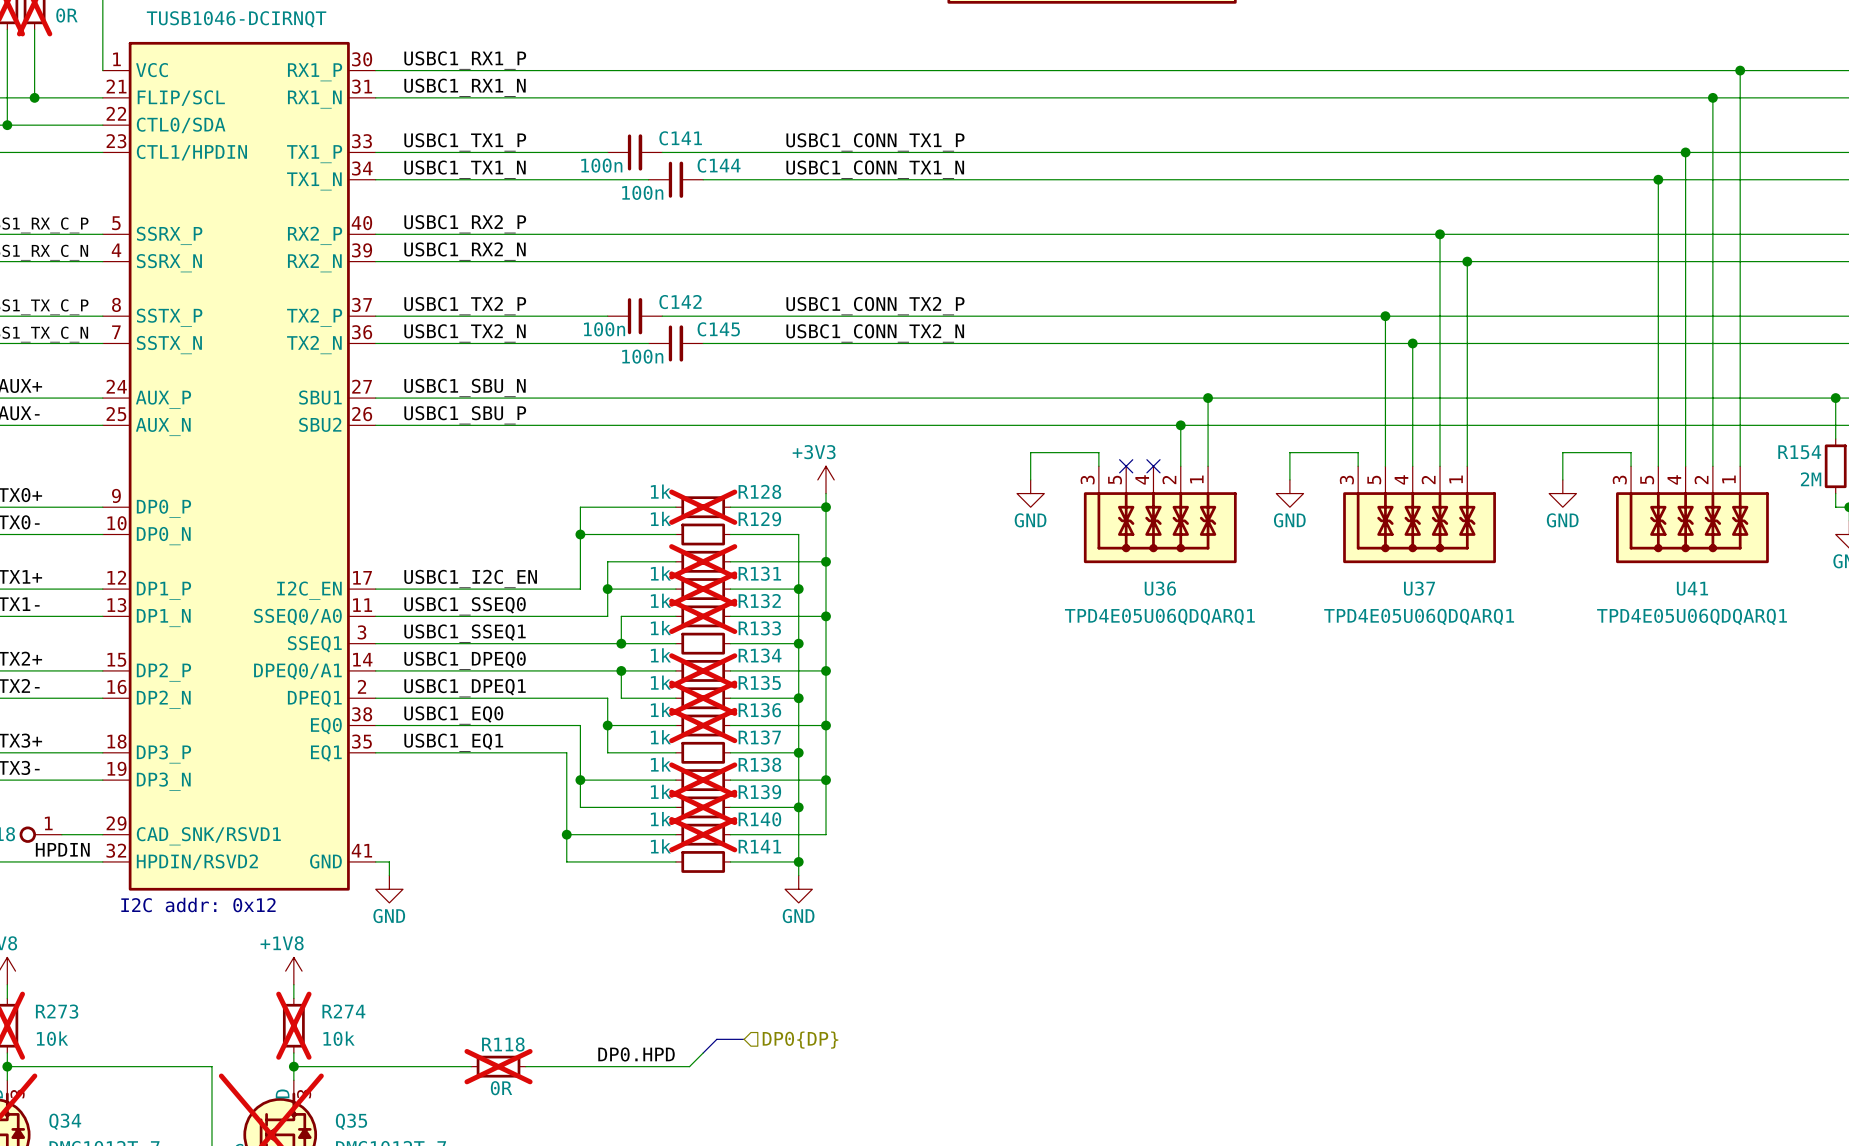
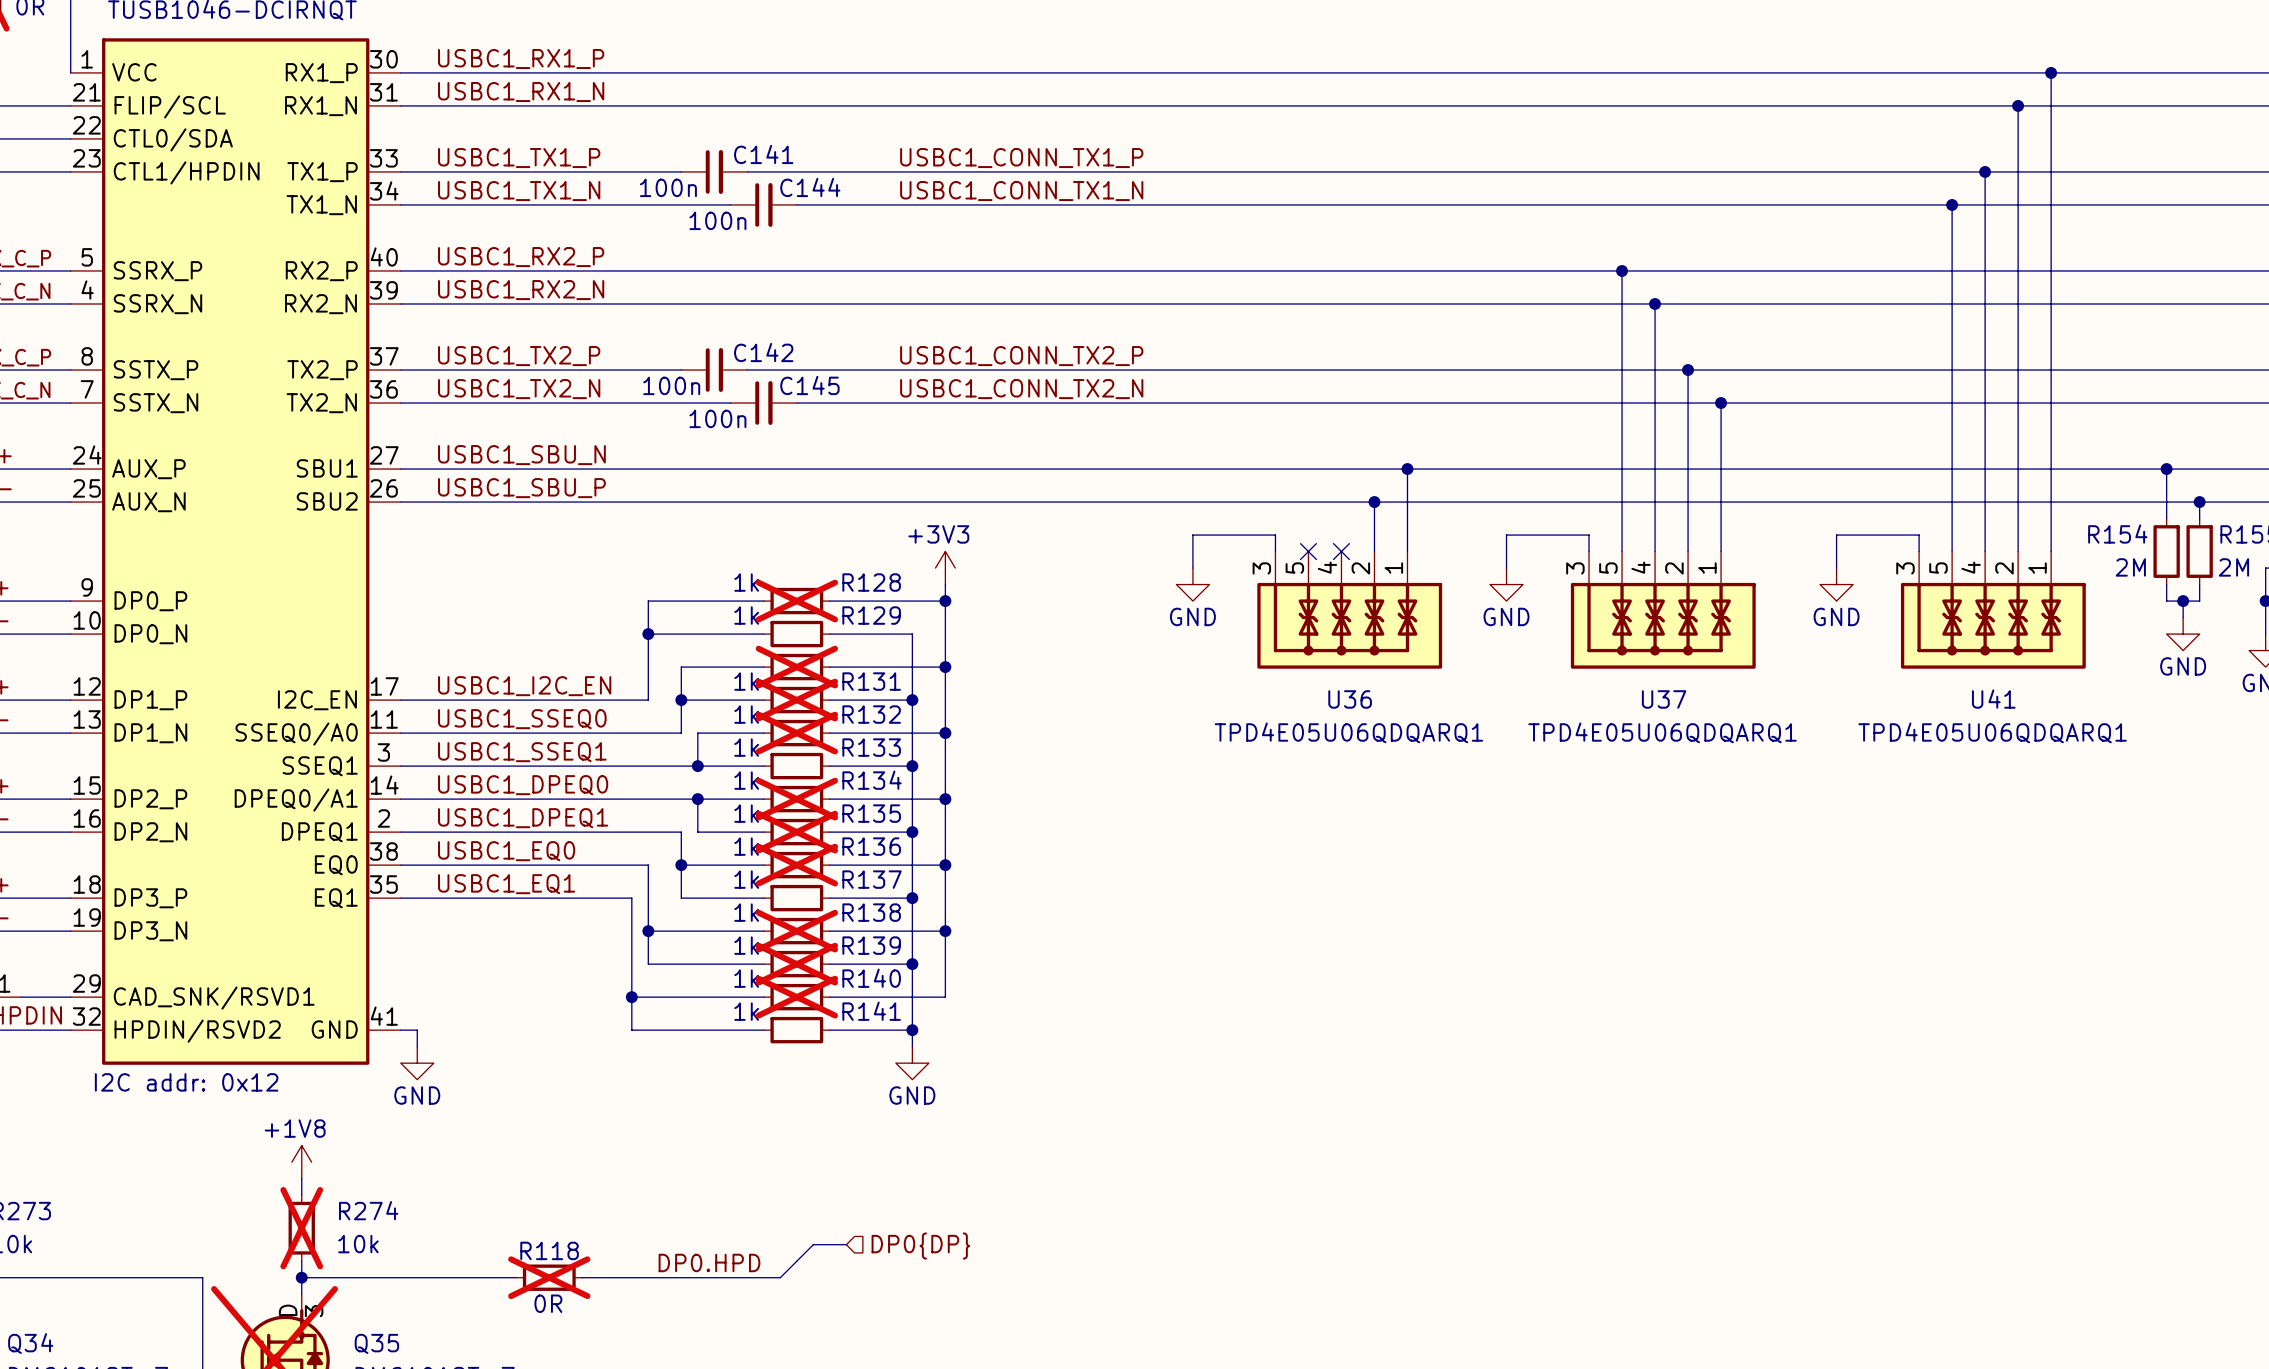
junction: none -> (1622, 270)
wire: (1440, 234) (1440, 316) -> (1655, 303) (1655, 403)
junction: (1440, 234) -> none
junction: none -> (1655, 303)
wire: (1467, 261) (1467, 343) -> (1622, 270) (1622, 370)
junction: (1467, 261) -> none
junction: (1385, 316) -> none
junction: none -> (1688, 370)
junction: (1412, 343) -> none
junction: none -> (1721, 403)

